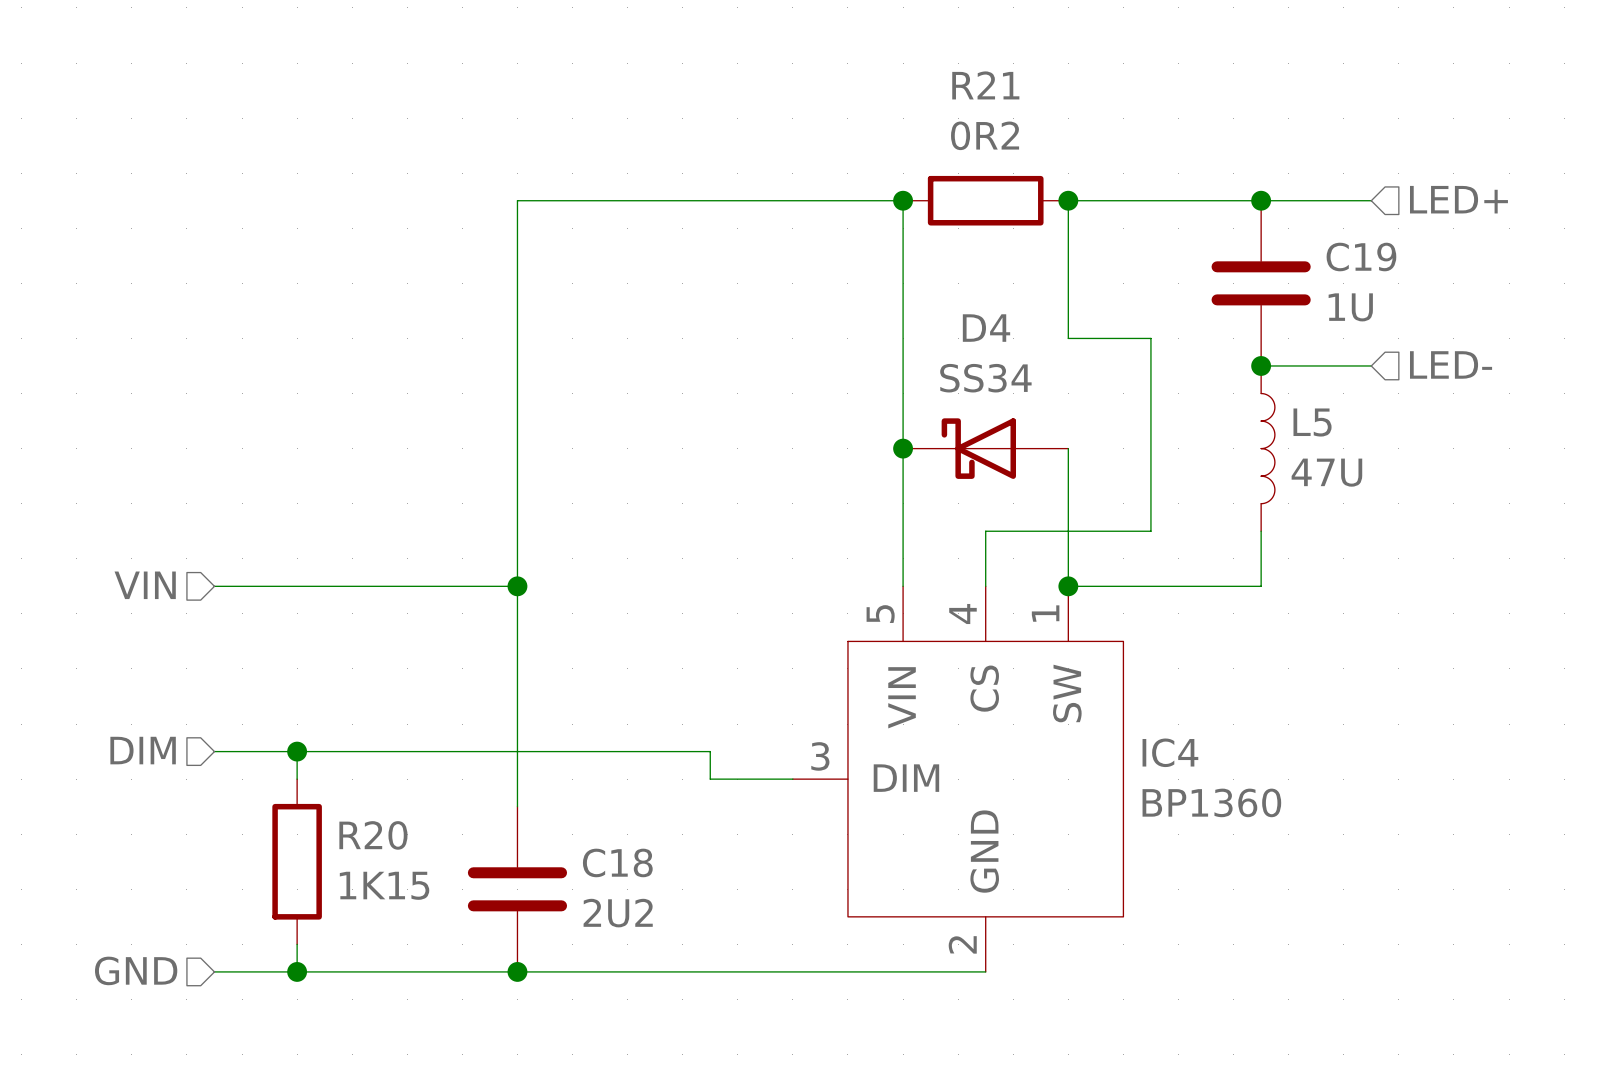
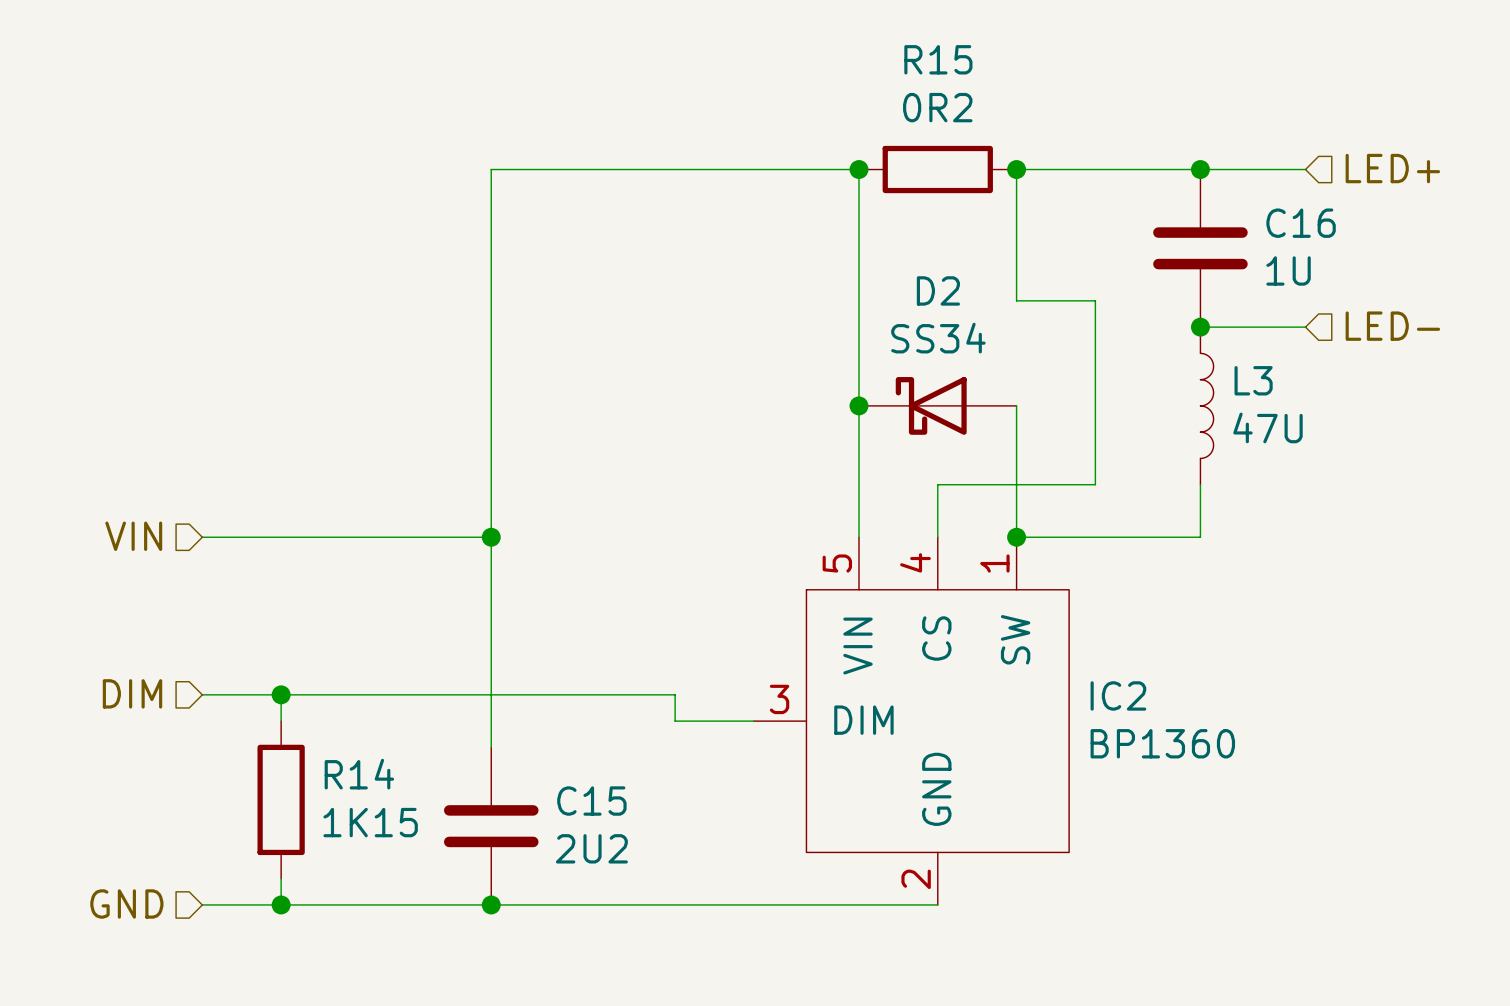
R21 name: R21 (985, 85) -> R15 (938, 59)
C19 name: C19 (1361, 257) -> C16 (1301, 223)
D4 name: D4 (986, 328) -> D2 (938, 290)
L5 name: L5 (1312, 422) -> L3 (1253, 380)
IC4 name: IC4 (1170, 752) -> IC2 (1118, 695)
R20 name: R20 (373, 835) -> R14 (359, 774)
C18 name: C18 (617, 862) -> C15 (591, 801)

